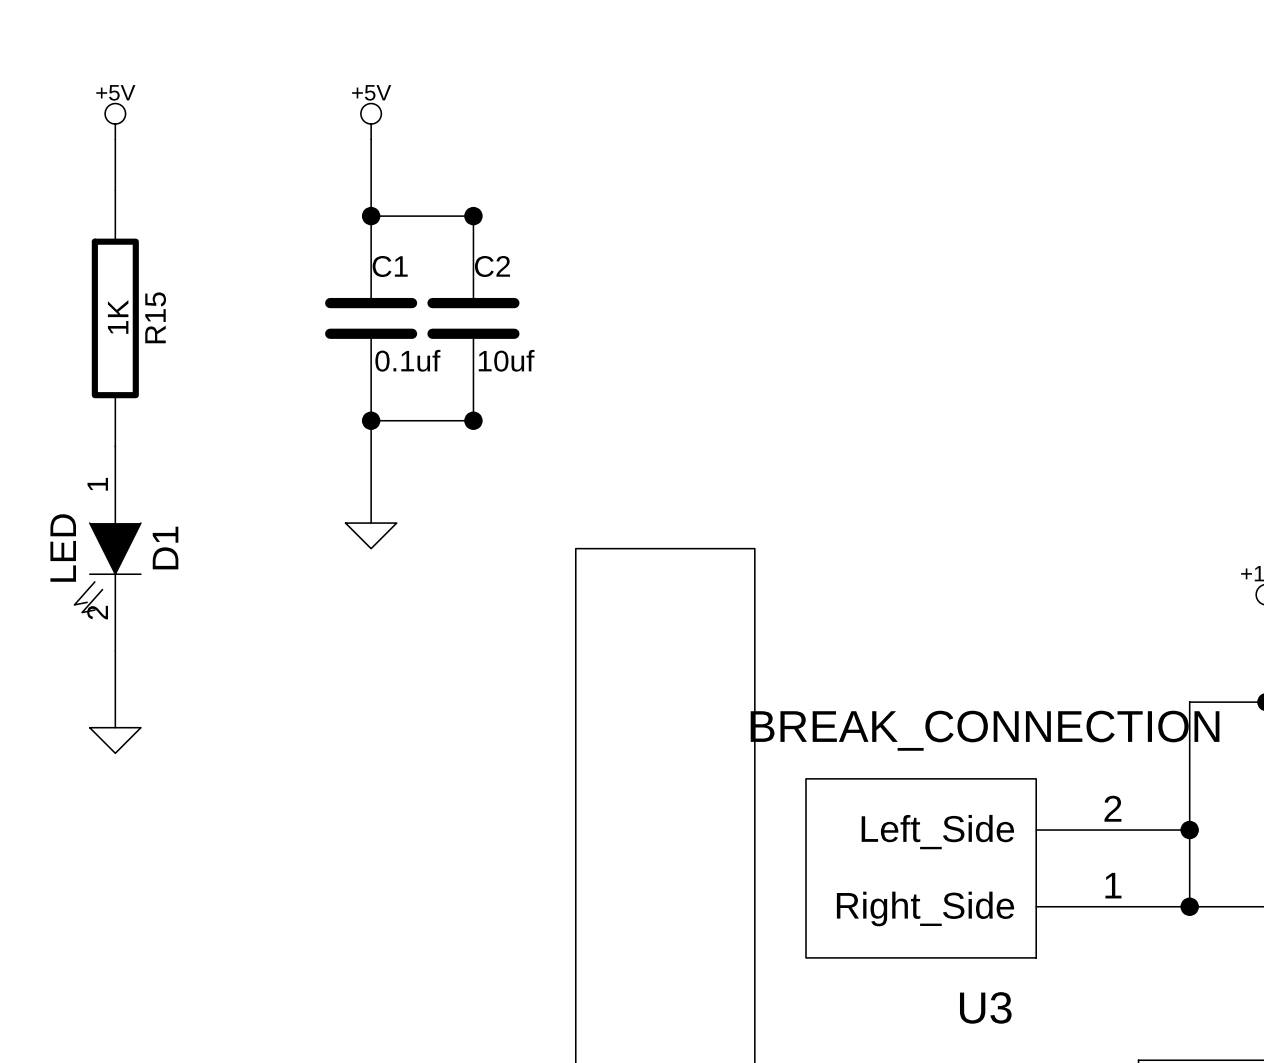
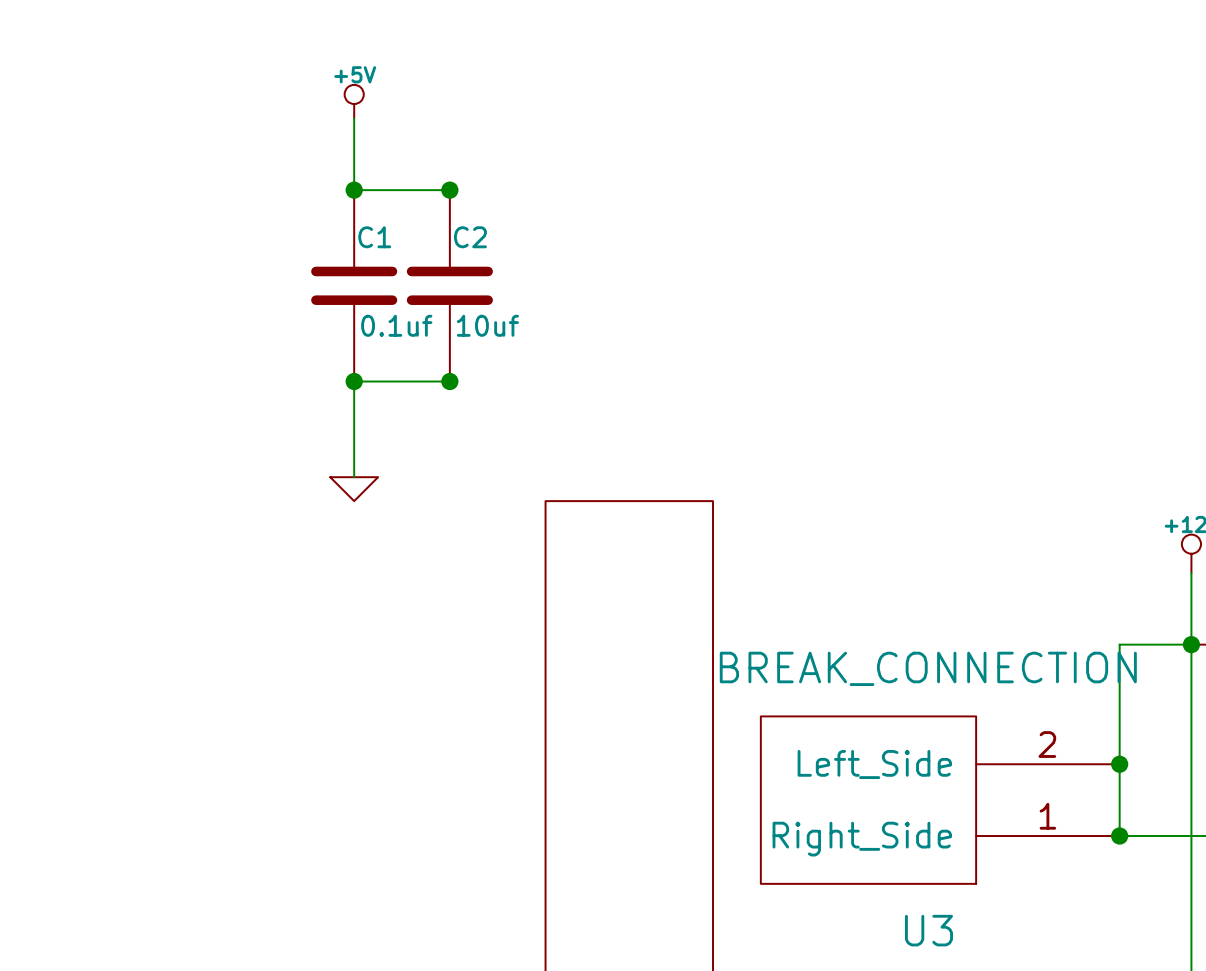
power symbol: +5V (115, 121) -> none
wire: (115, 139) (115, 190) -> none
R15: 1K (115, 318) -> none
D1: LED (107, 548) -> none
wire: (115, 650) (115, 727) -> none
power symbol: (115, 740) -> none

